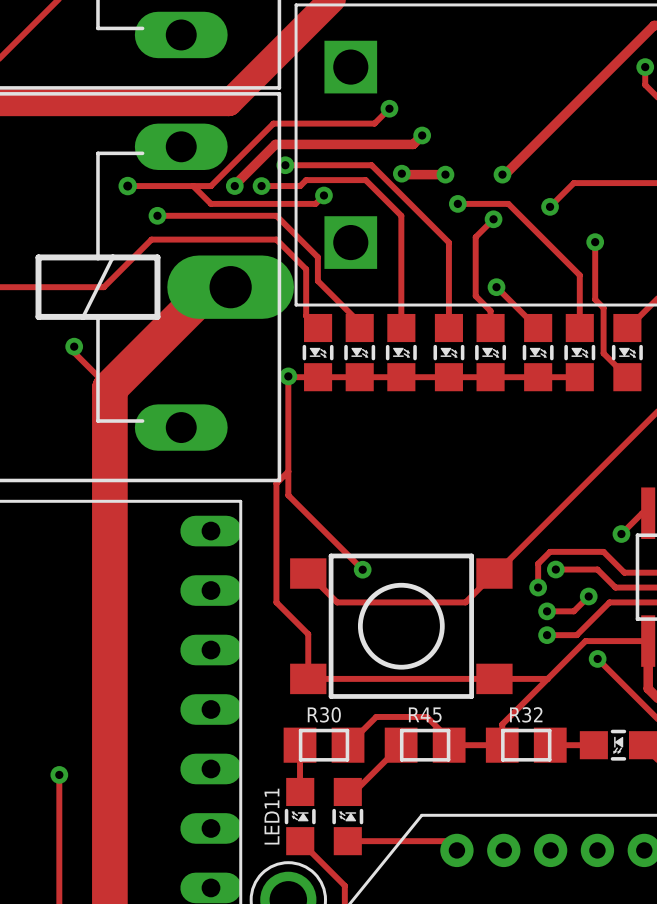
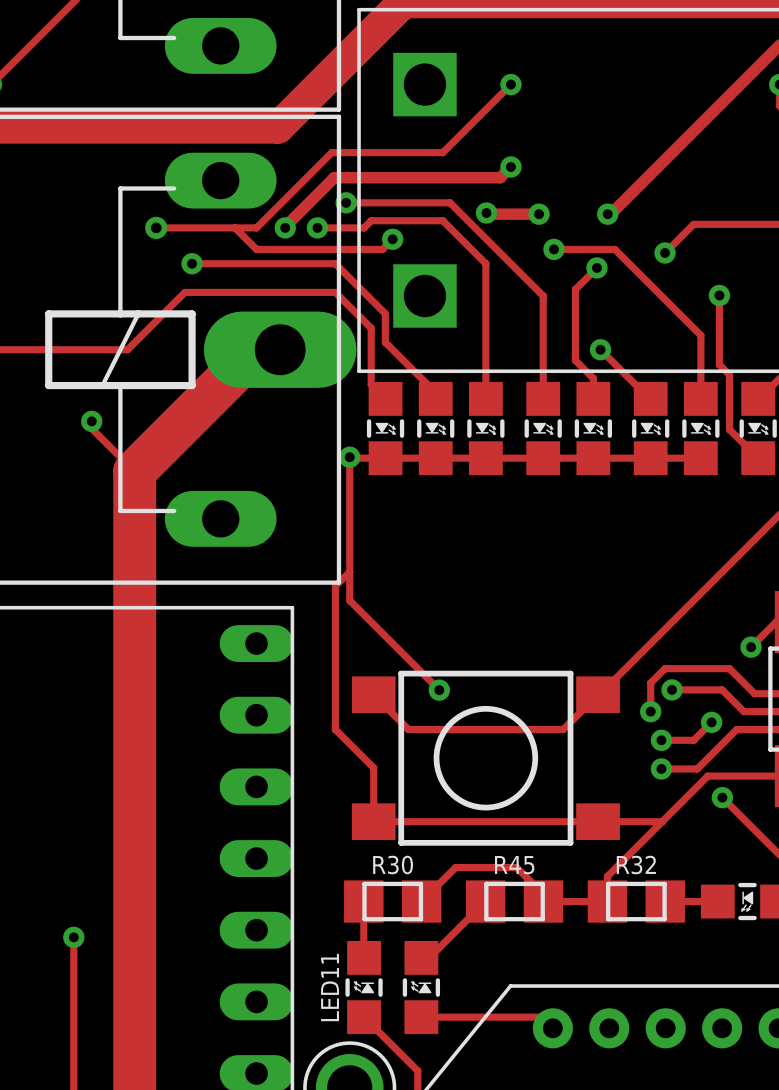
track: (389, 108) (374, 123) (365, 123) -> (510, 84) (442, 152)
via position: (389, 108) -> (510, 84)

